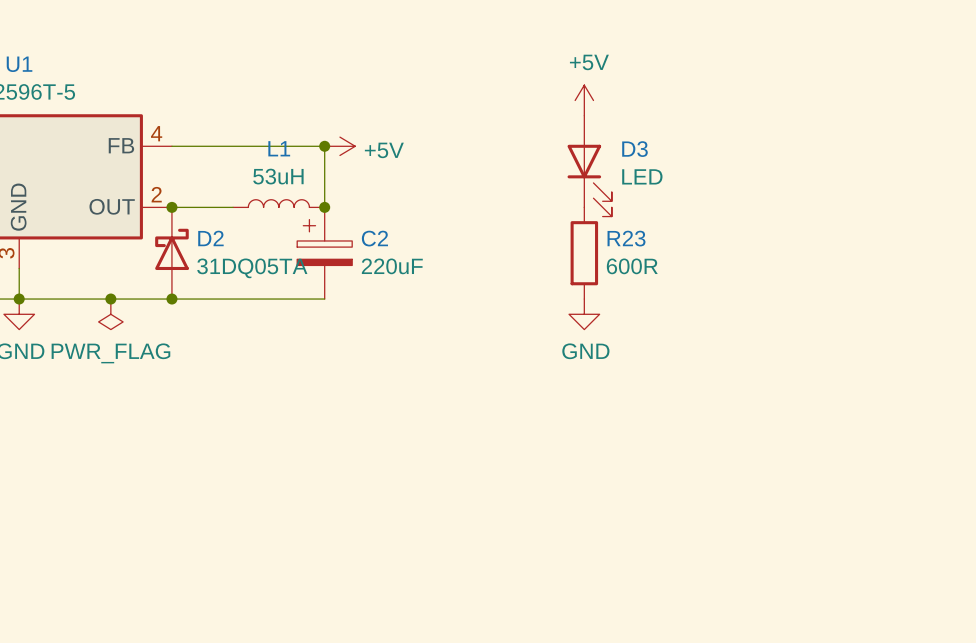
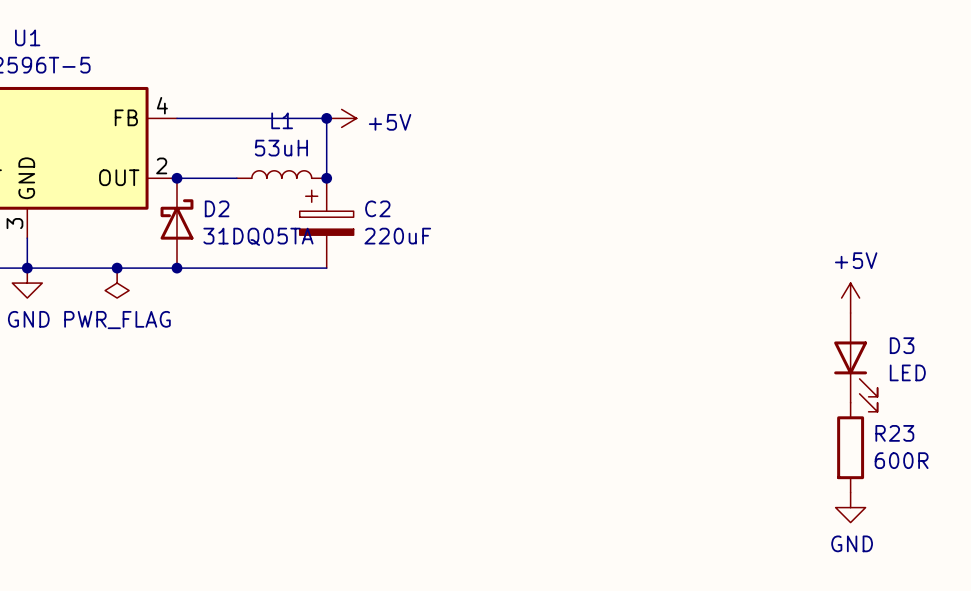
power symbol: +5V (584, 100) -> none
D3 position: (589, 166) -> (855, 362)
R23 position: (584, 253) -> (850, 447)
power symbol: GND (584, 314) -> none
power symbol: none -> +5V (850, 298)
power symbol: none -> GND (850, 507)

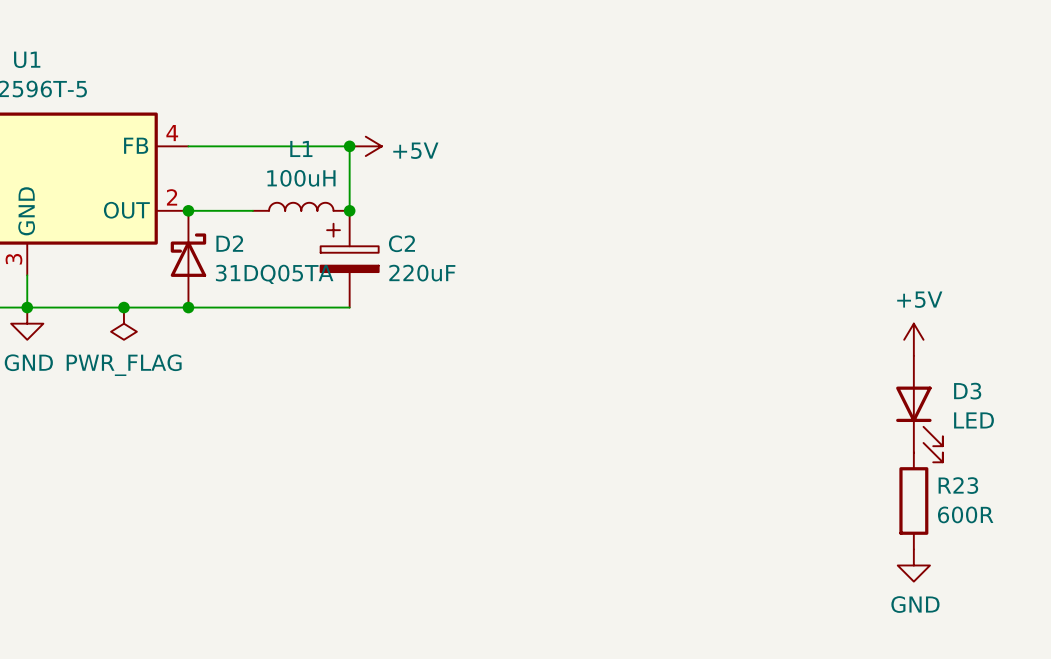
L1 value: 53uH (281, 148) -> 100uH (301, 178)

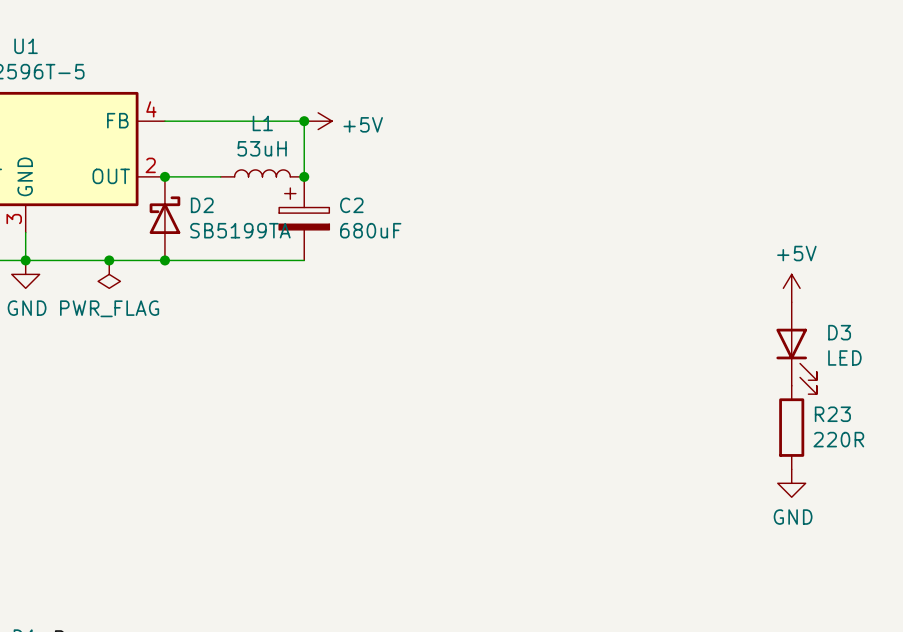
L1 value: 100uH (301, 178) -> 53uH (262, 148)
C2 value: 220uF (422, 273) -> 680uF (370, 230)
D2 value: 31DQ05TA (274, 274) -> SB5199TA (240, 230)
R23 value: 600R (965, 514) -> 220R (838, 439)

